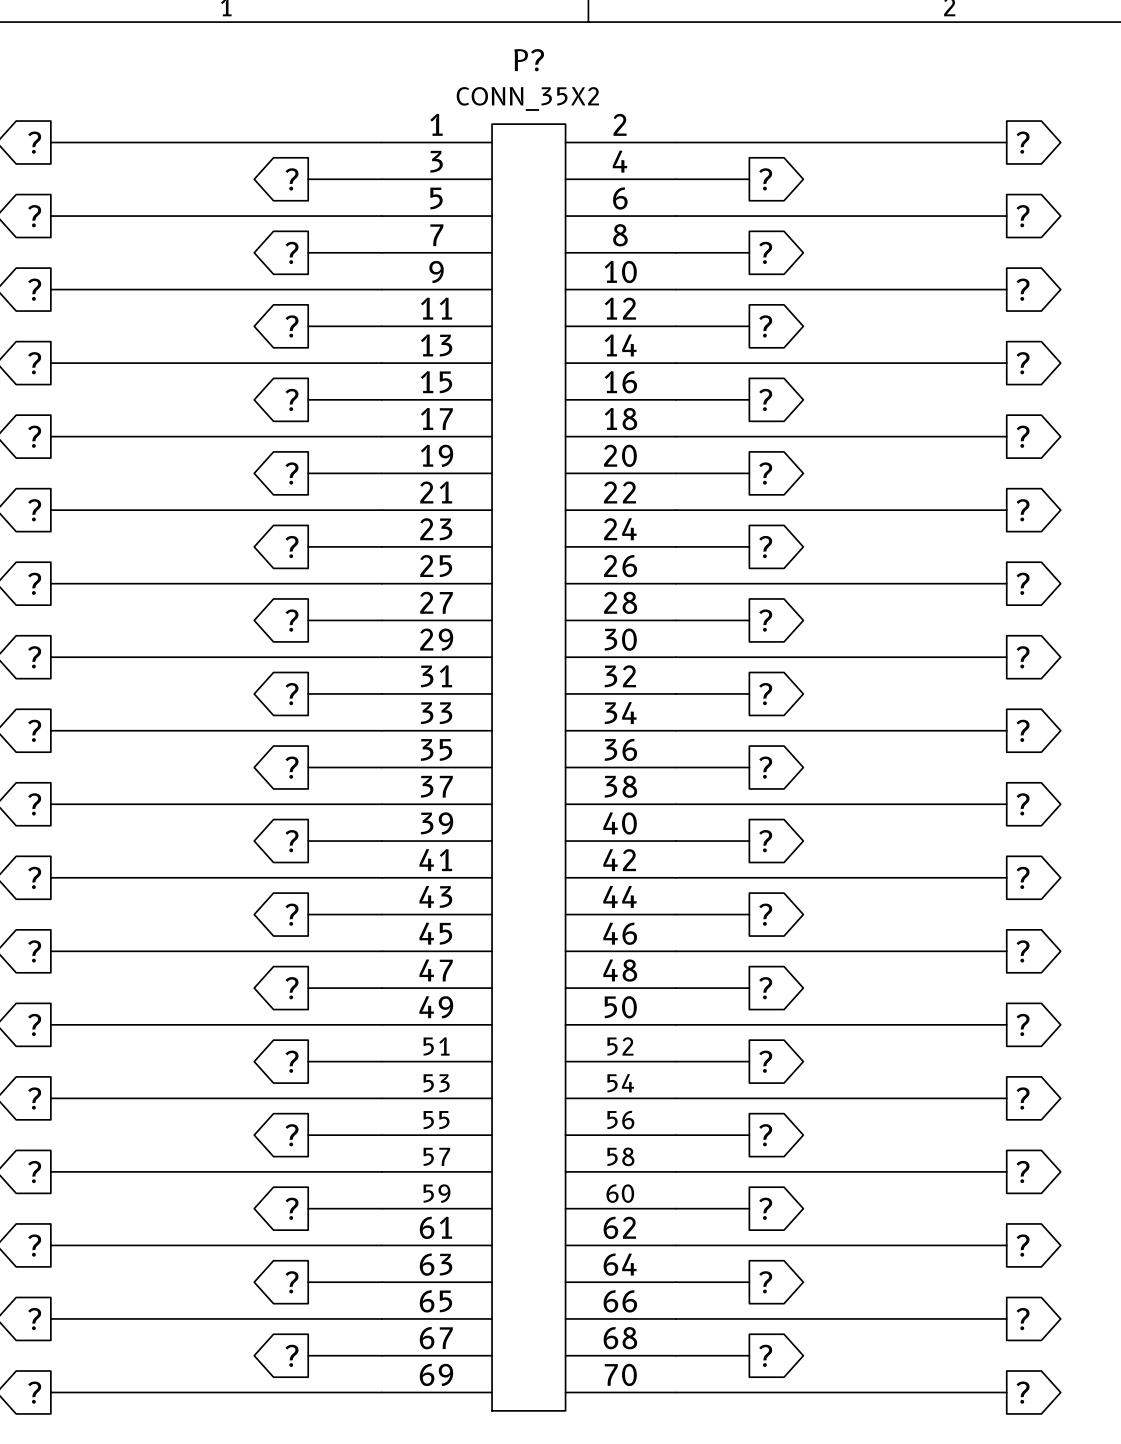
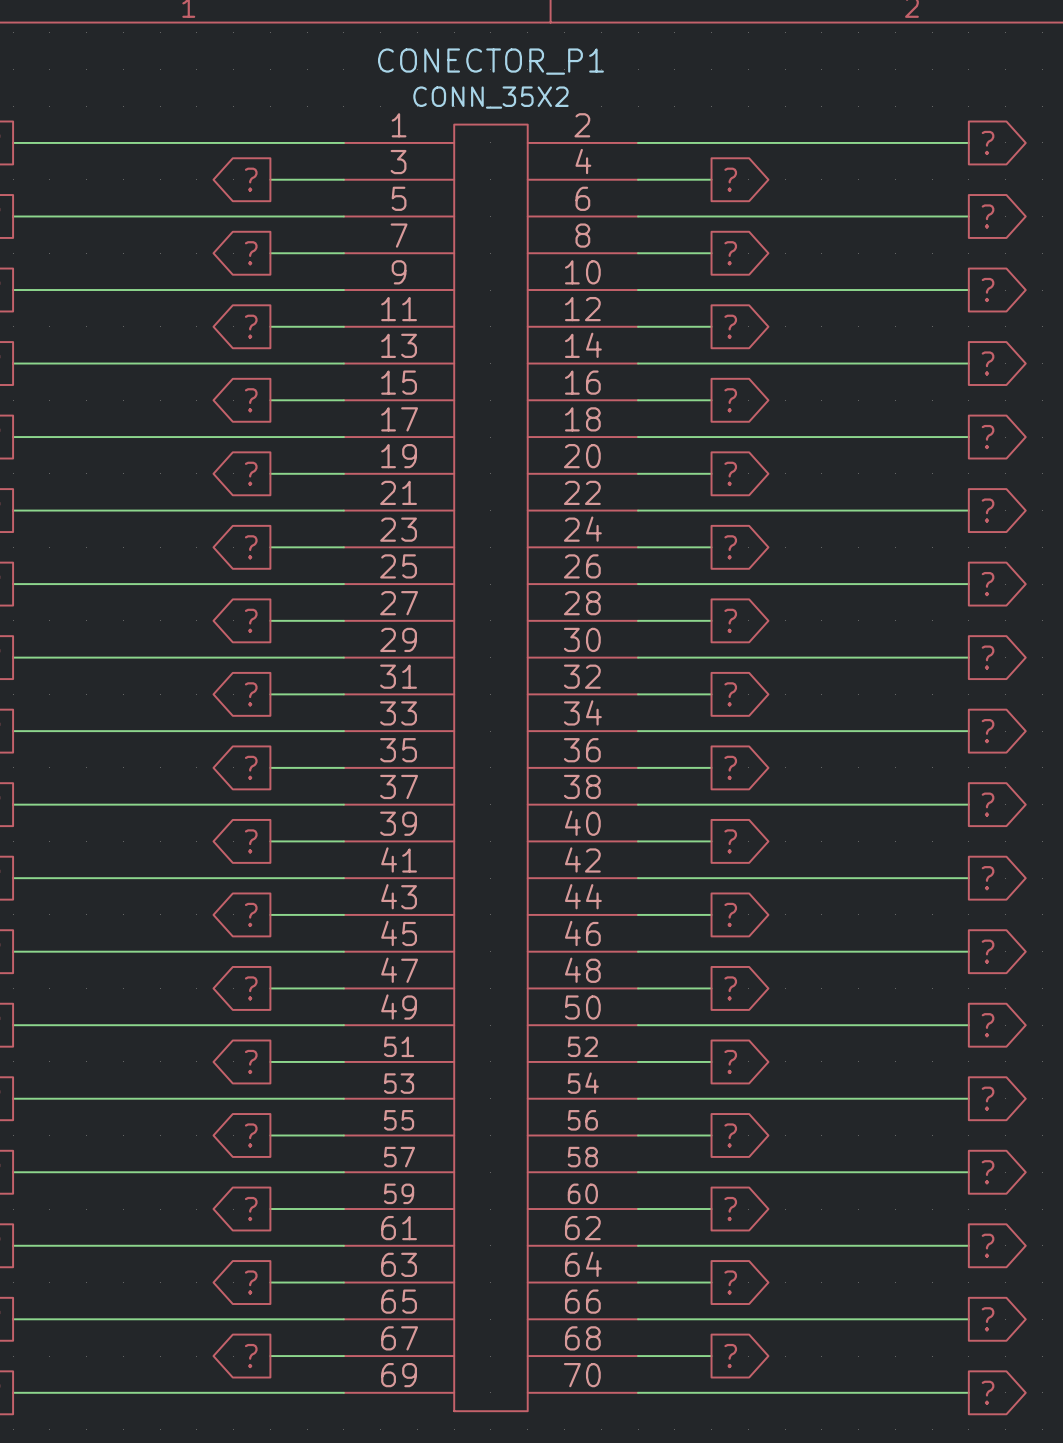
P? name: P? (529, 60) -> CONECTOR_P1 (490, 61)

